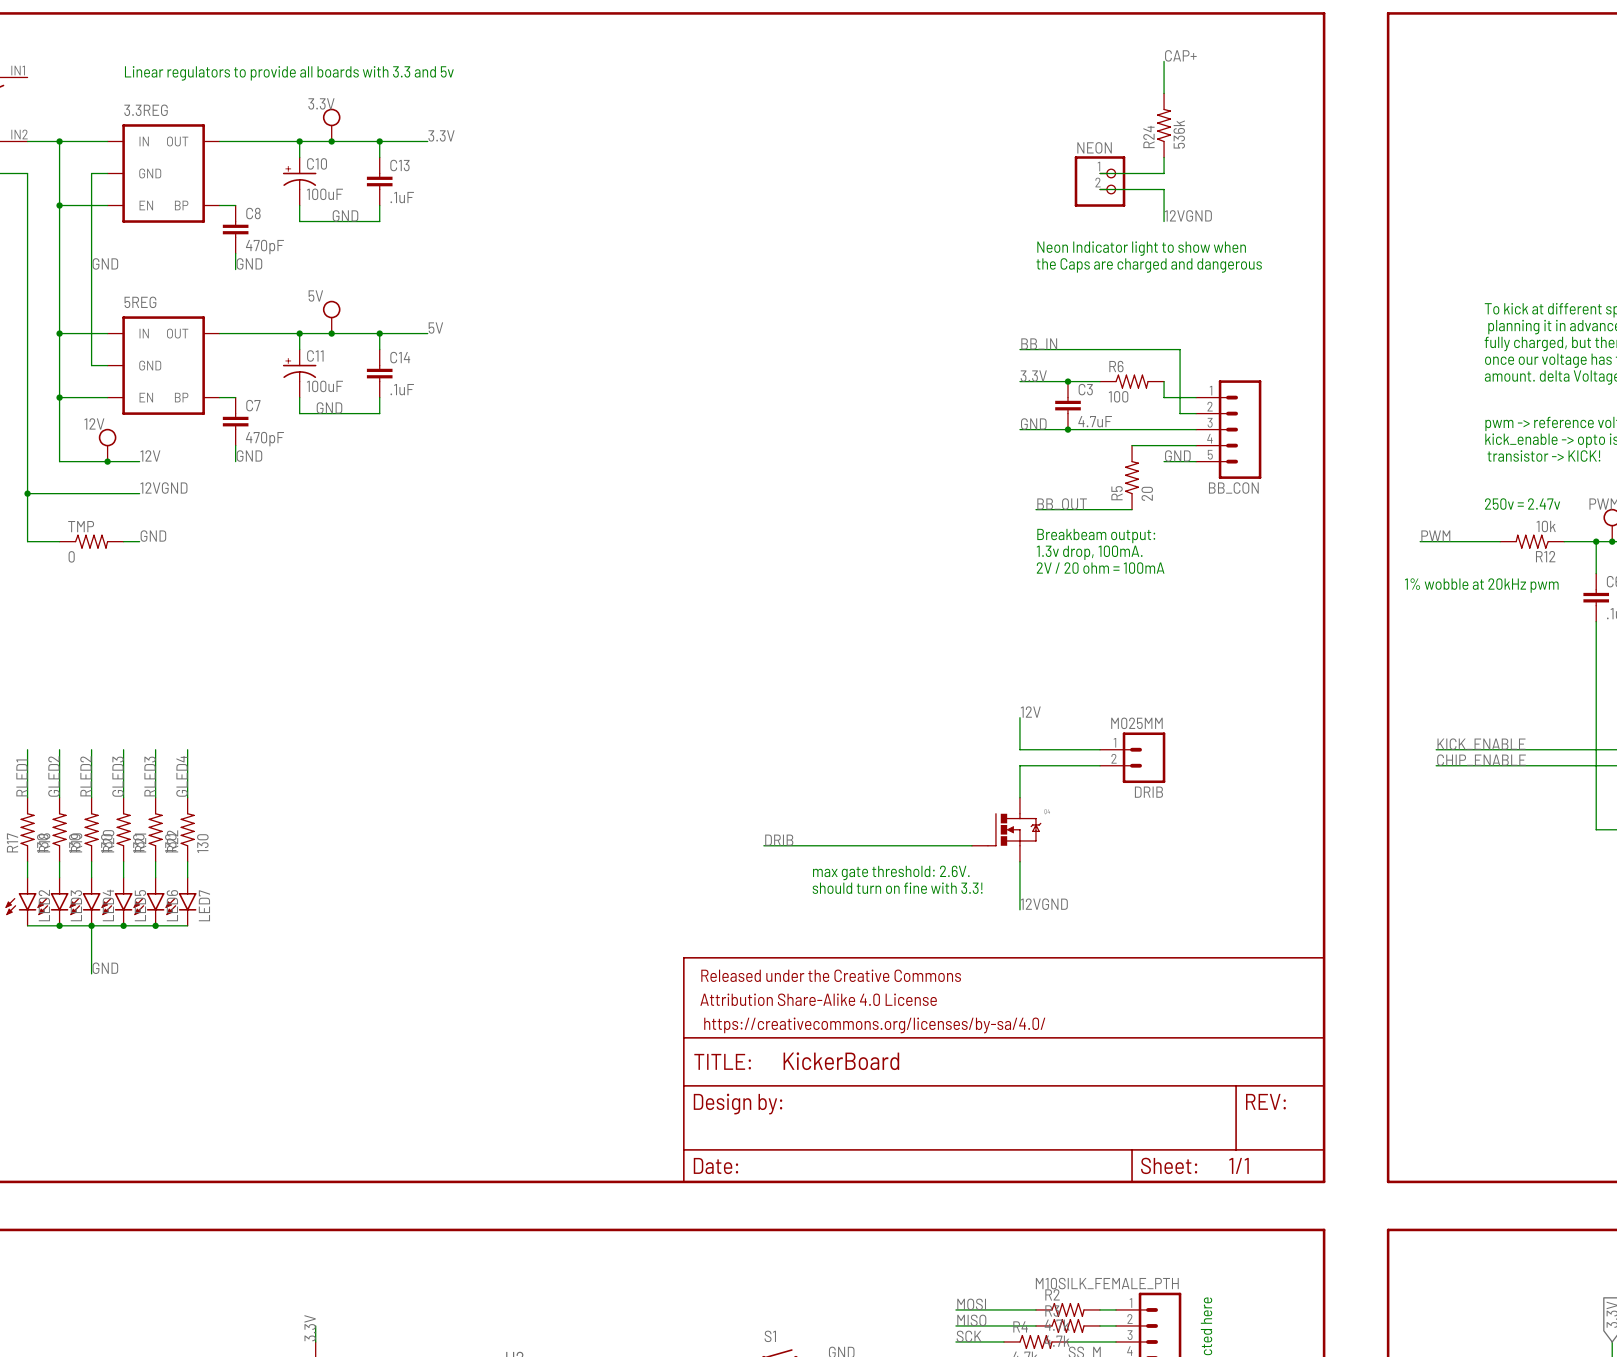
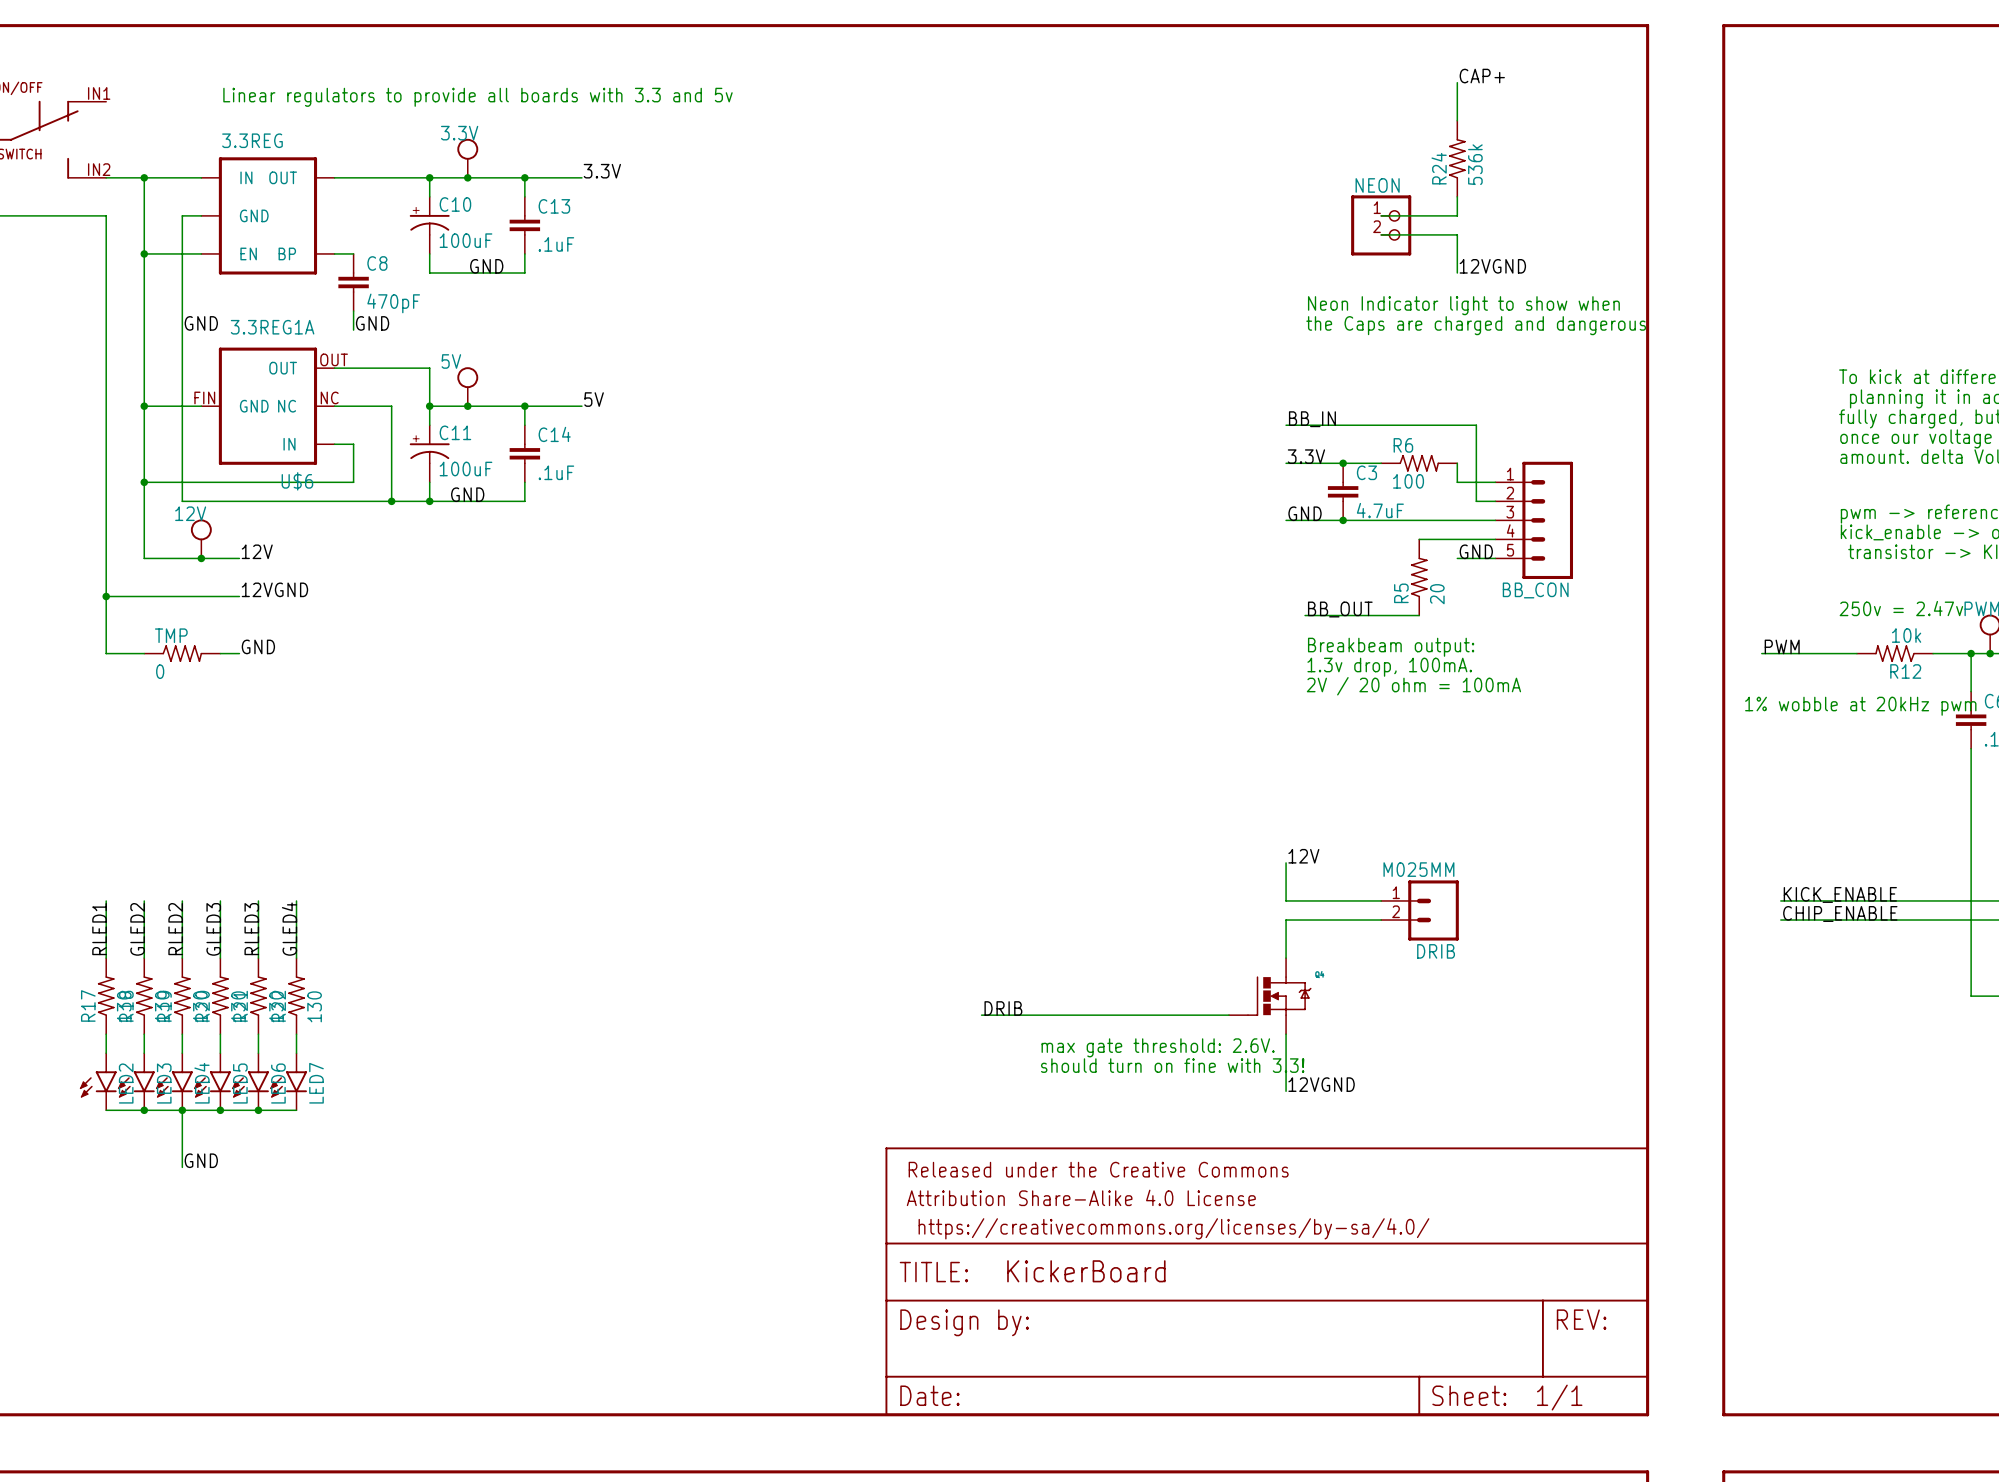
U$6: none -> 3.3REG1A (267, 406)
wire: (267, 333) (299, 333) -> (334, 368) (429, 368) (429, 406)
wire: none -> (391, 406) (391, 501)
wire: (91, 365) (107, 365) -> (182, 444) (182, 501) (429, 501)
5REG: (163, 365) -> none
wire: none -> (334, 444) (353, 444) (353, 482)
wire: none -> (201, 482) (334, 482)
junction: none -> (391, 501)
junction: none -> (429, 501)
C7: 470pF (235, 421) -> none
wire: (235, 445) (235, 461) -> none
label: GND (249, 456) -> none

